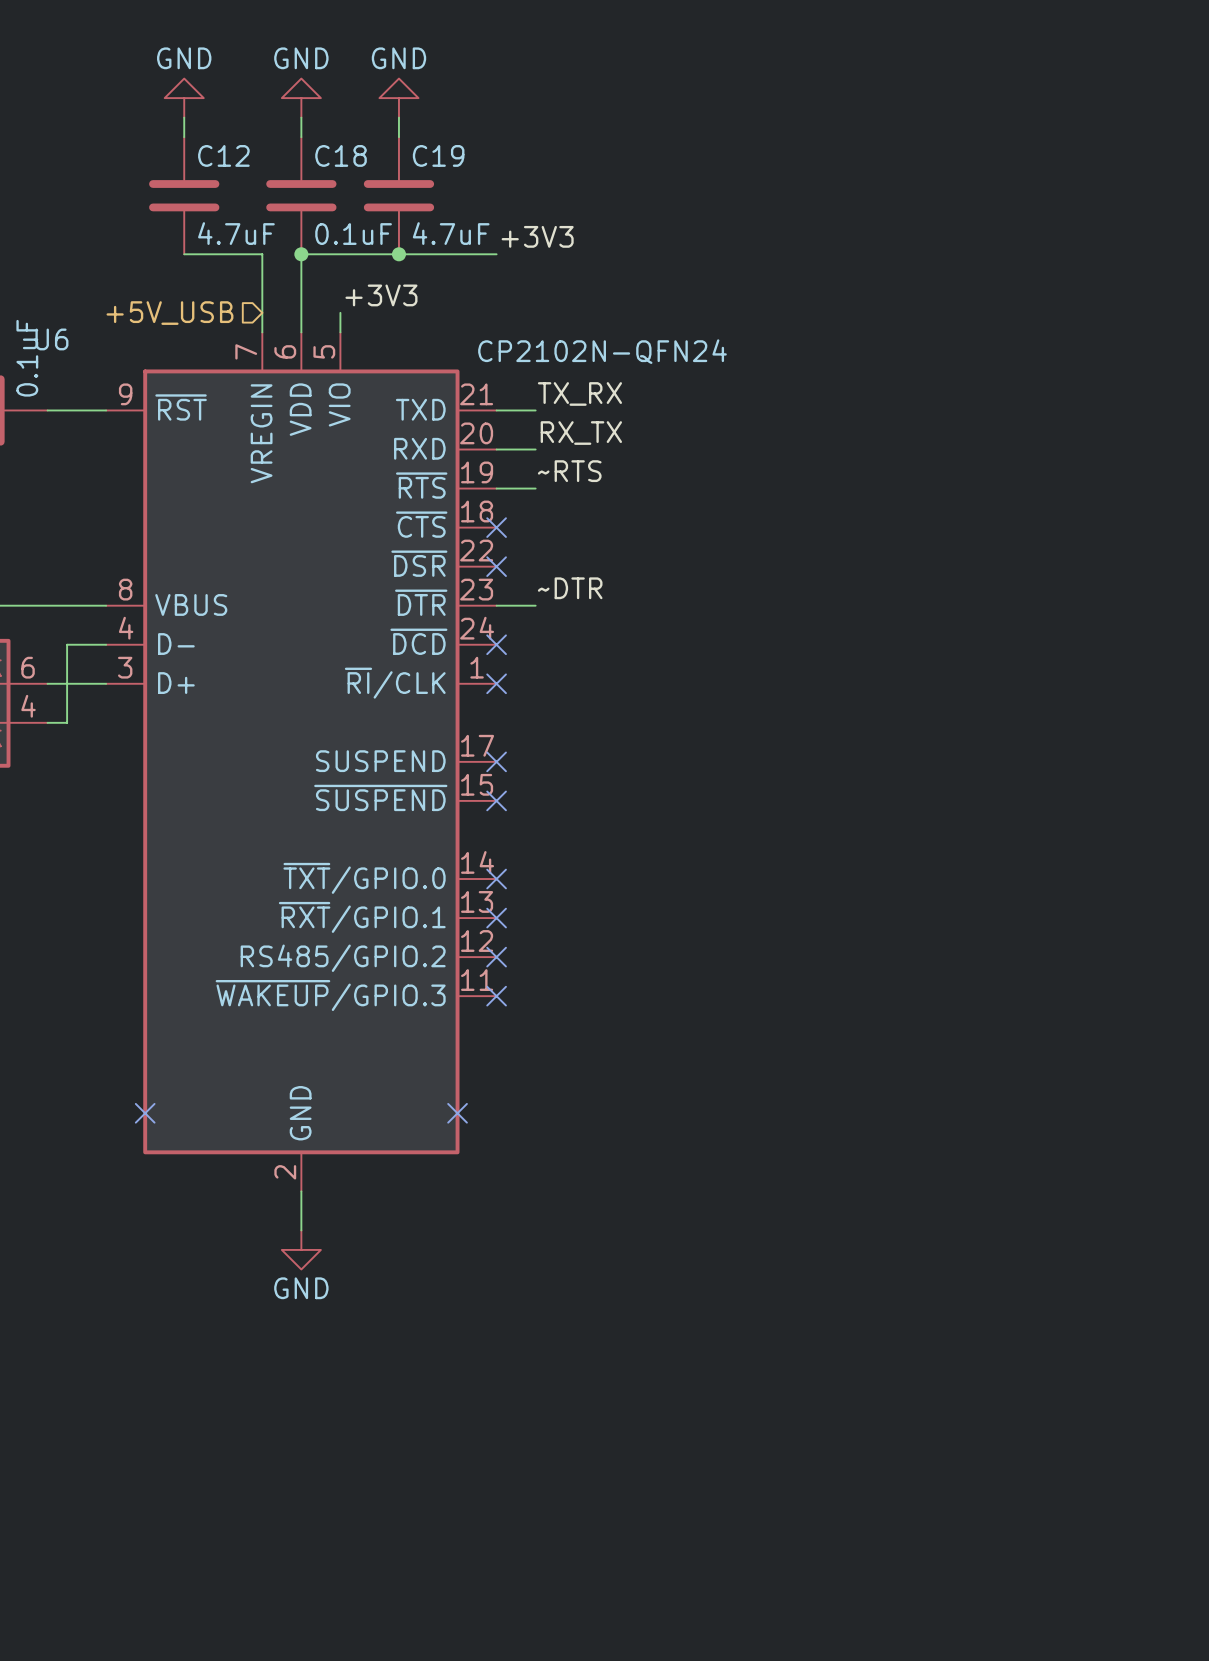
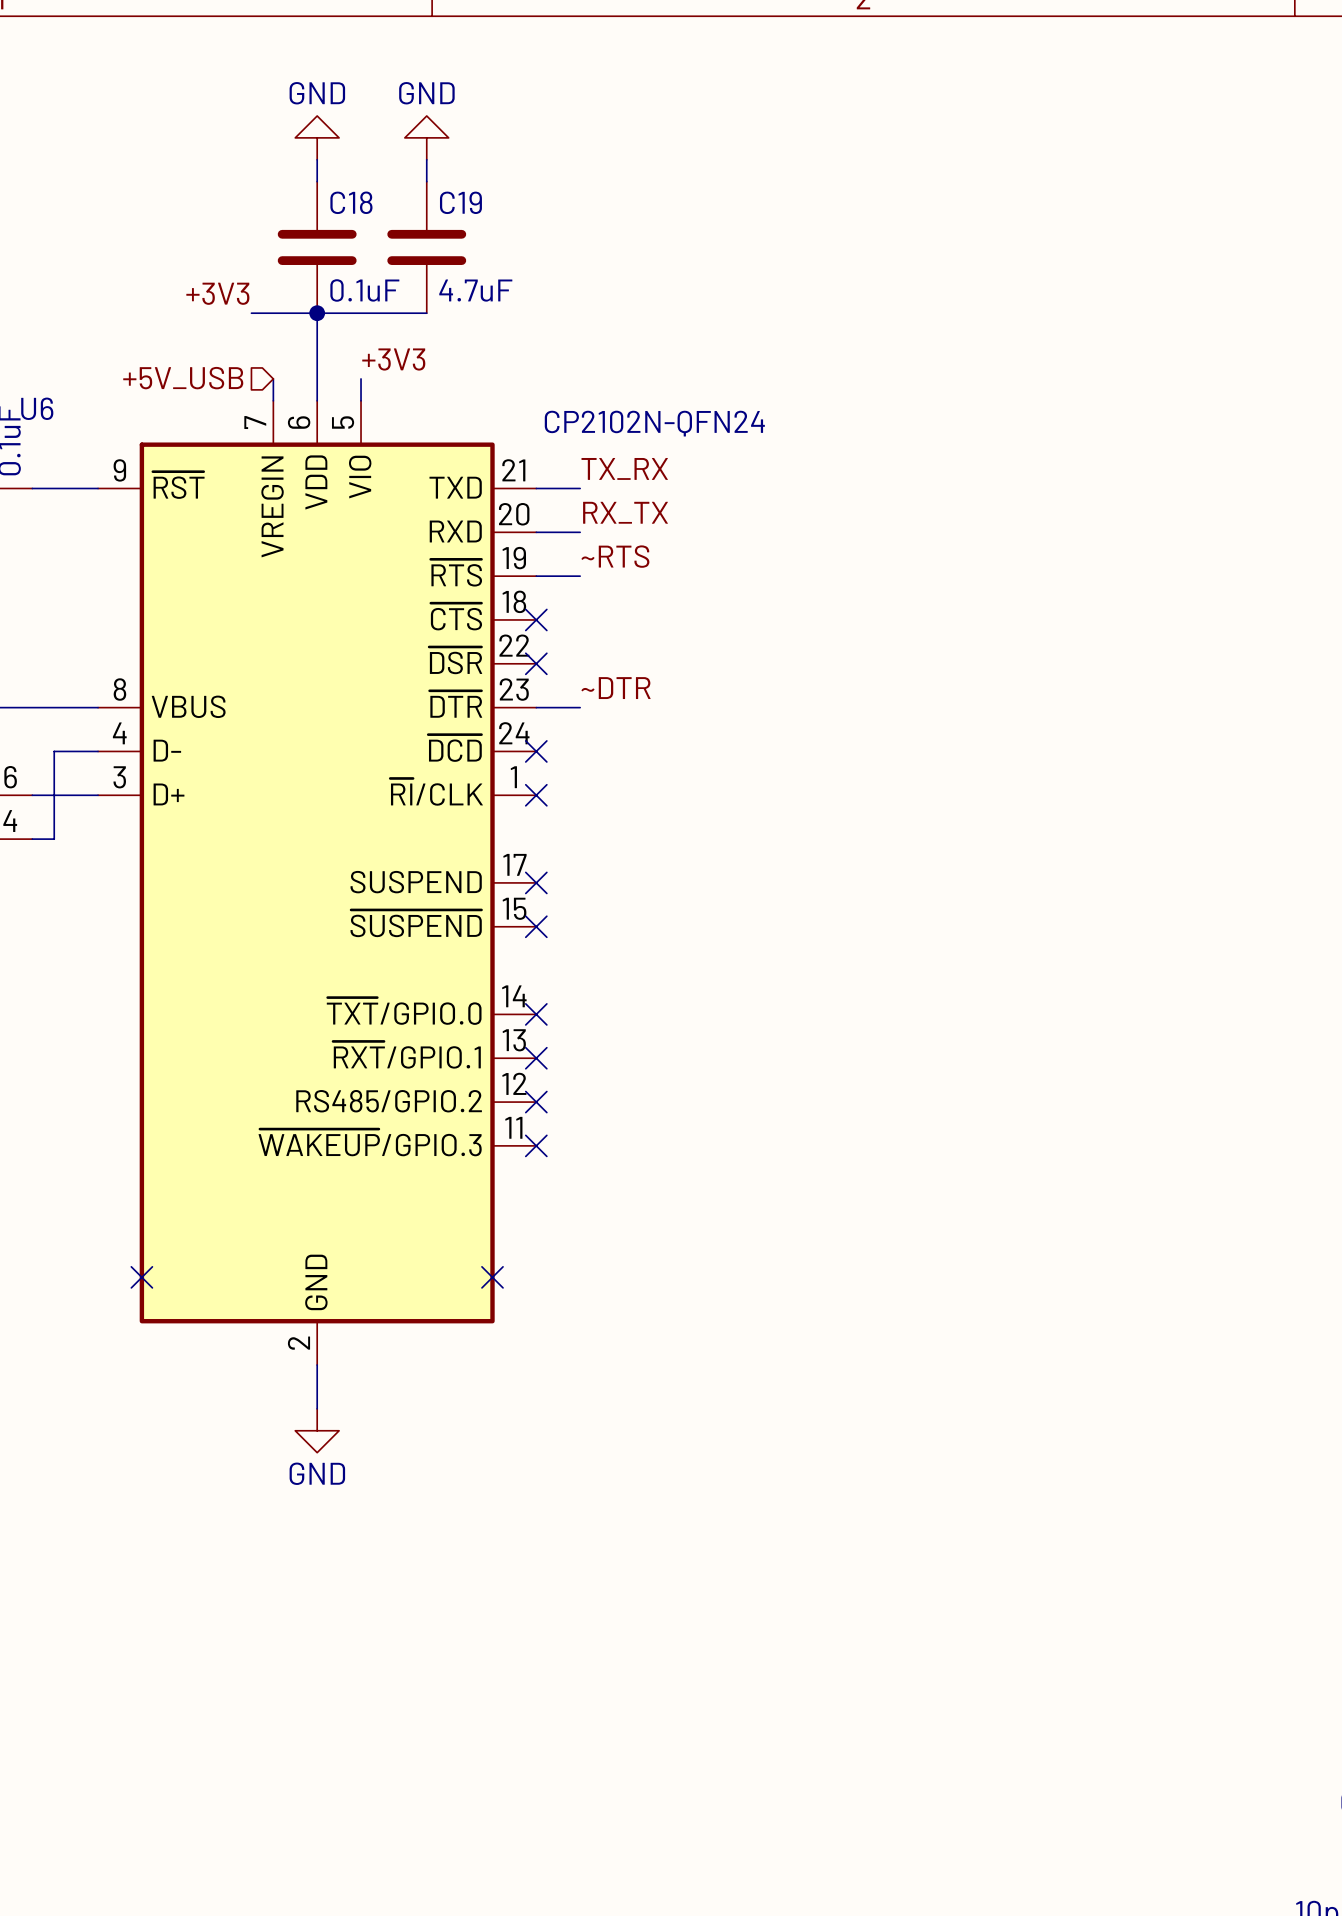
power symbol: GND (184, 98) -> none
wire: (184, 117) (184, 137) -> none
C12: 4.7uF (184, 195) -> none
label position: +3V3 (537, 236) -> +3V3 (217, 293)
wire: (184, 254) (242, 254) -> none
wire: (262, 254) (262, 312) -> (273, 313) (317, 313)
wire: (398, 254) (496, 254) -> none
junction: (398, 254) -> none

